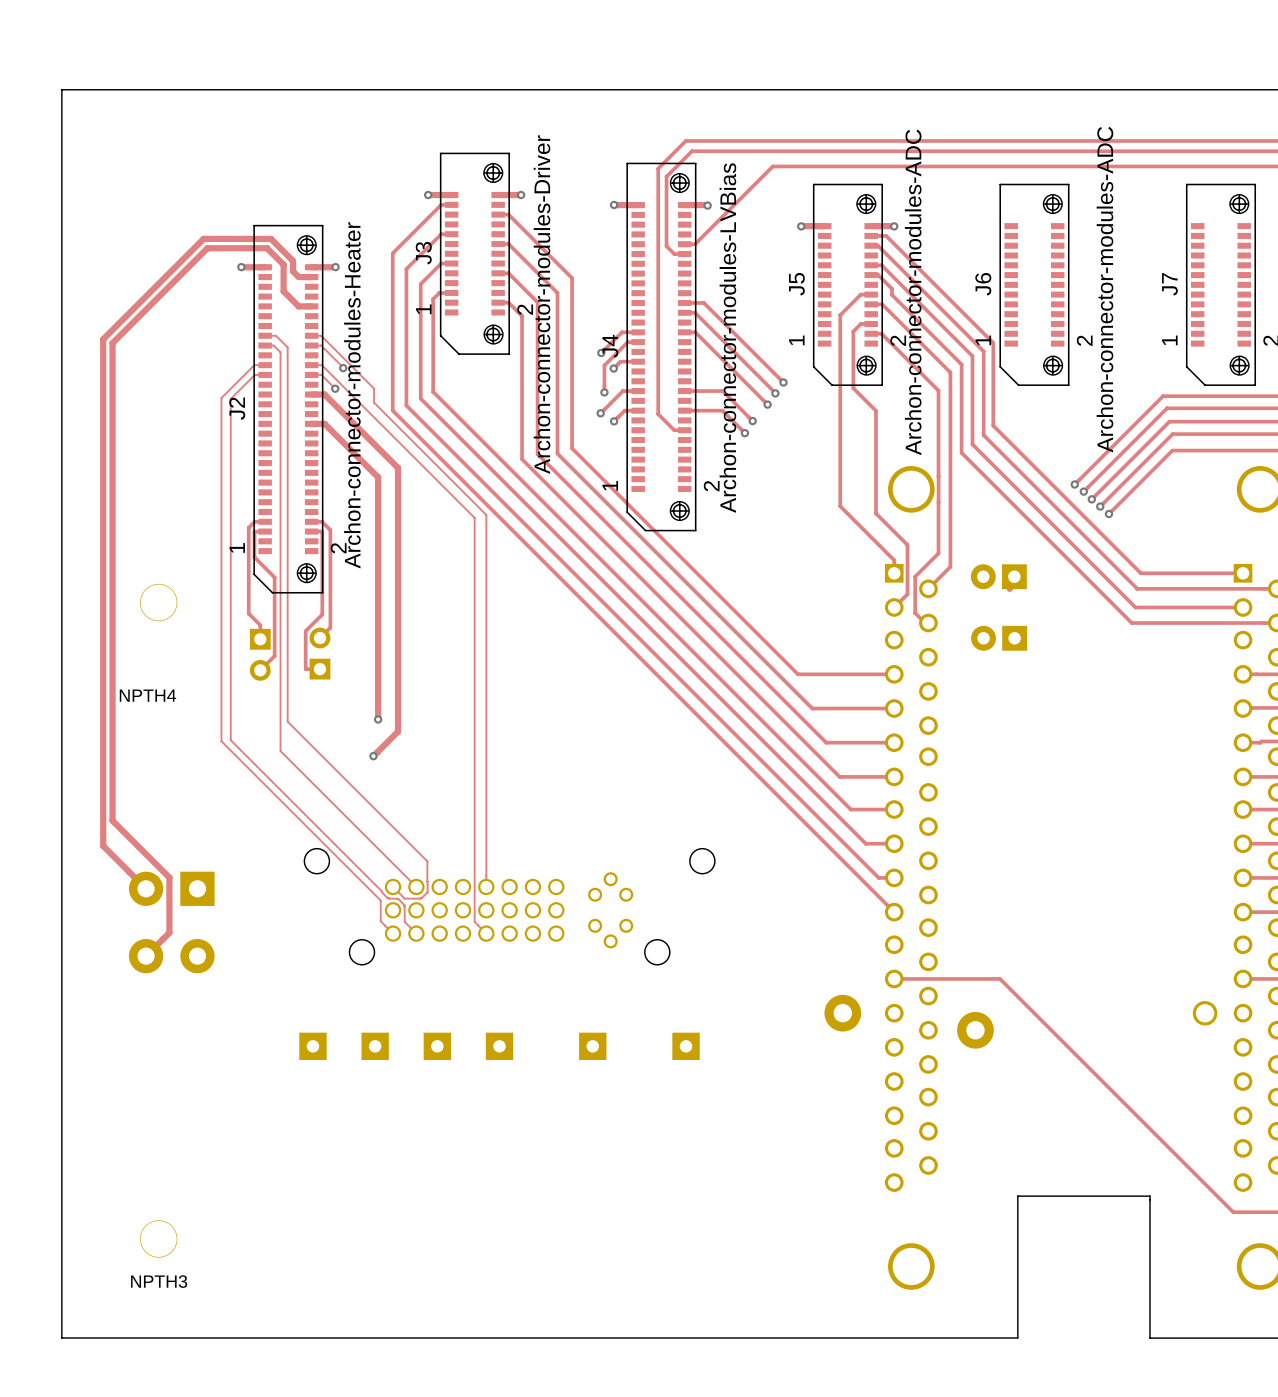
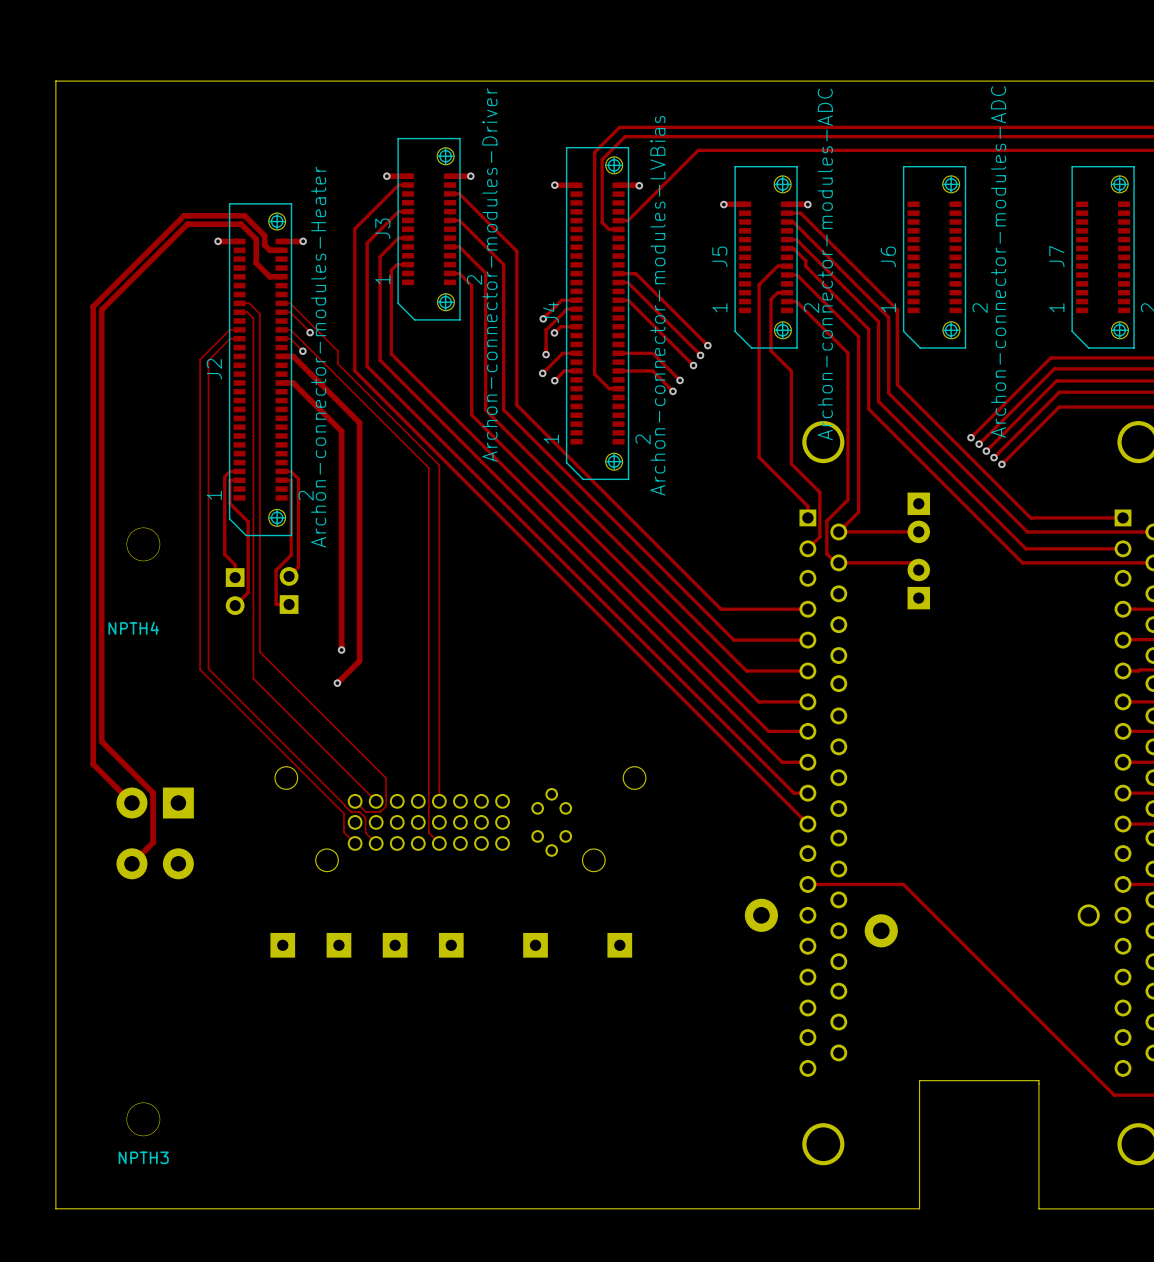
part rotation: 0° (998, 576) -> 90° counterclockwise (918, 517)
track: none -> (838, 531) (918, 531)
track: none -> (838, 562) (911, 562) (918, 570)
part rotation: 0° (999, 638) -> 90° clockwise (918, 584)

